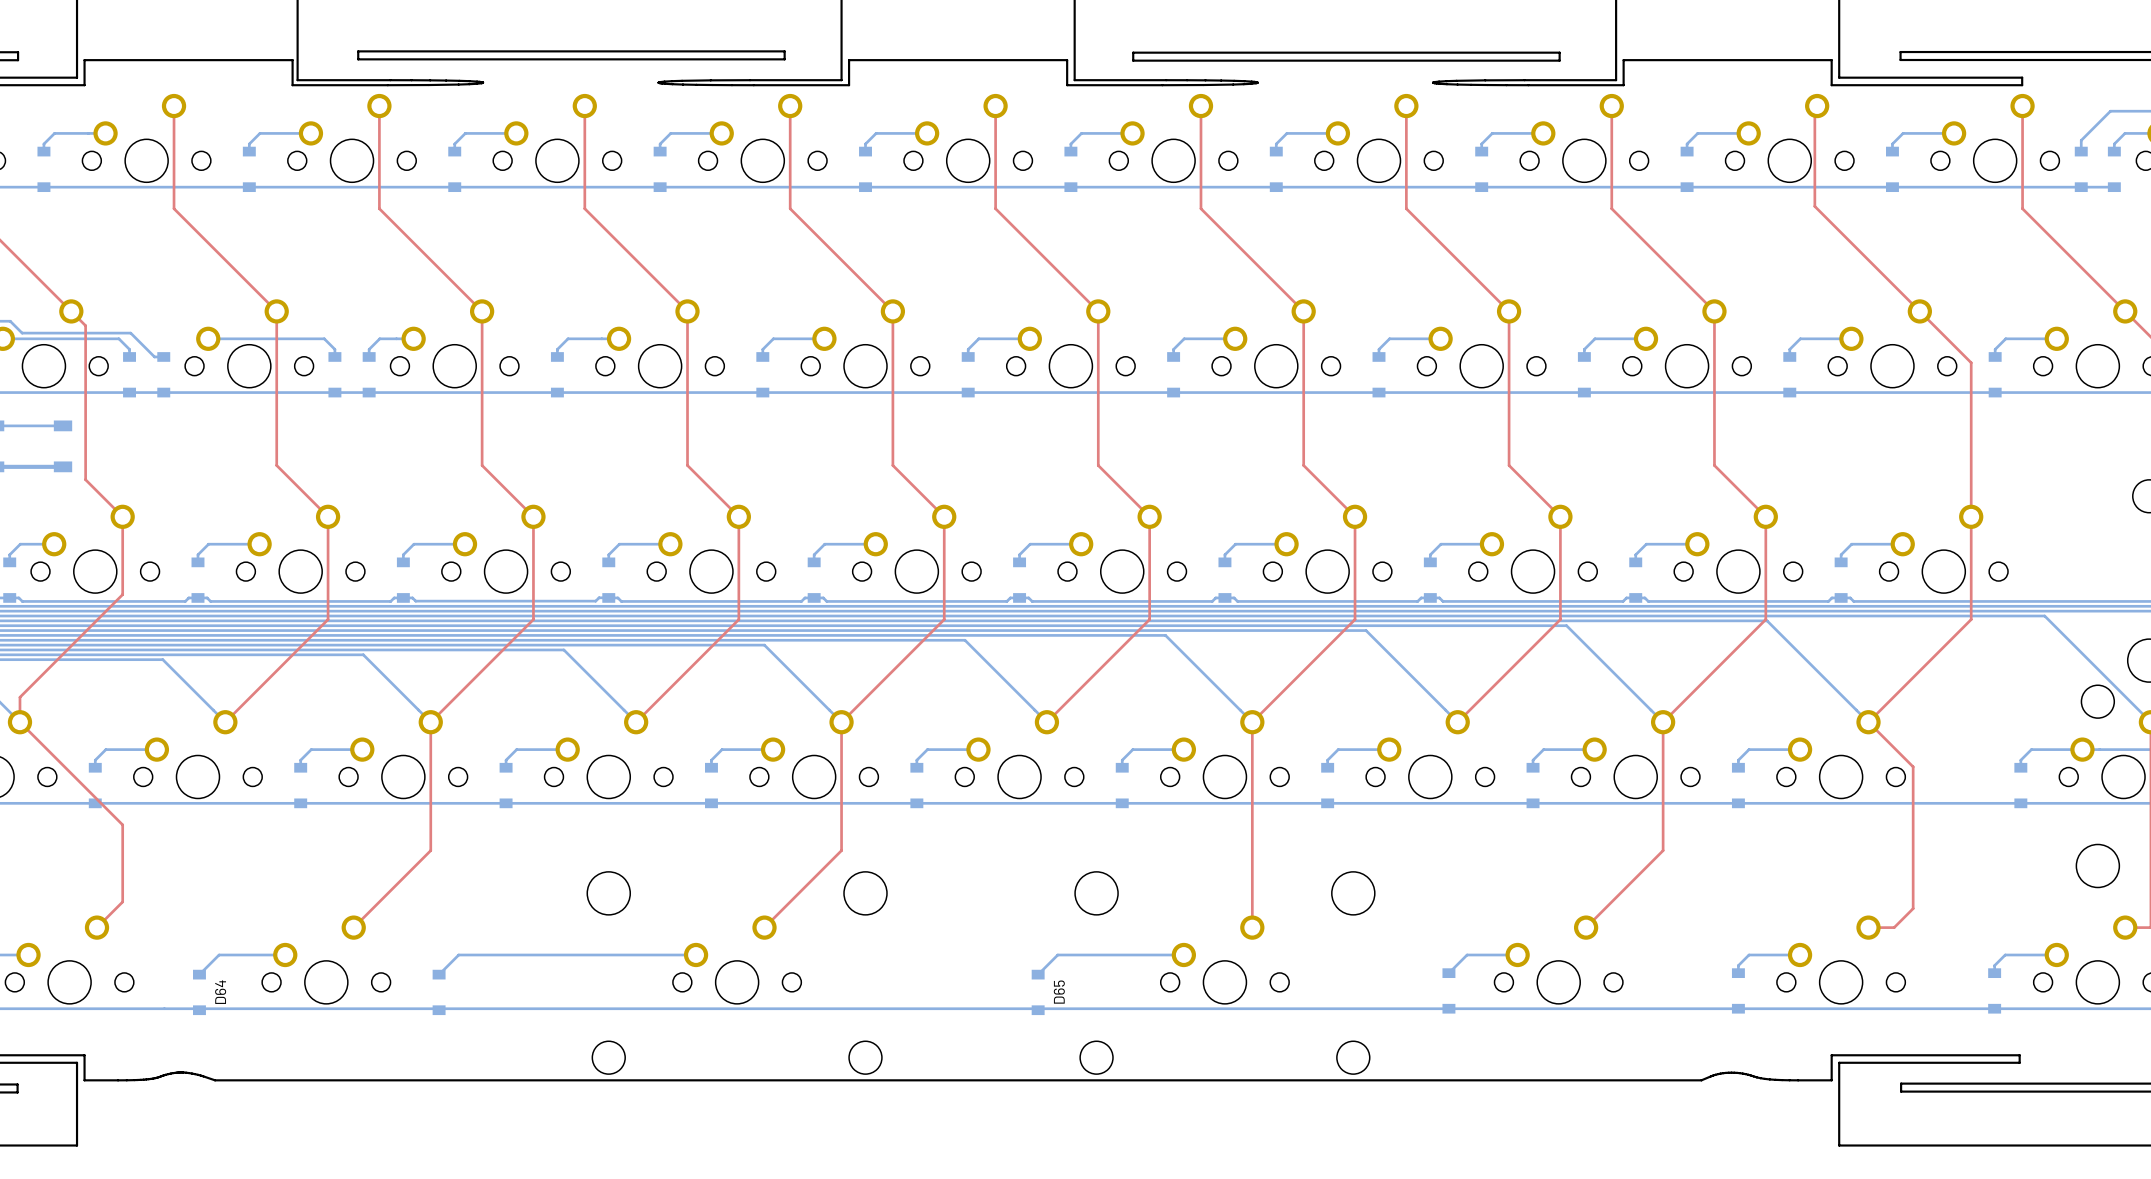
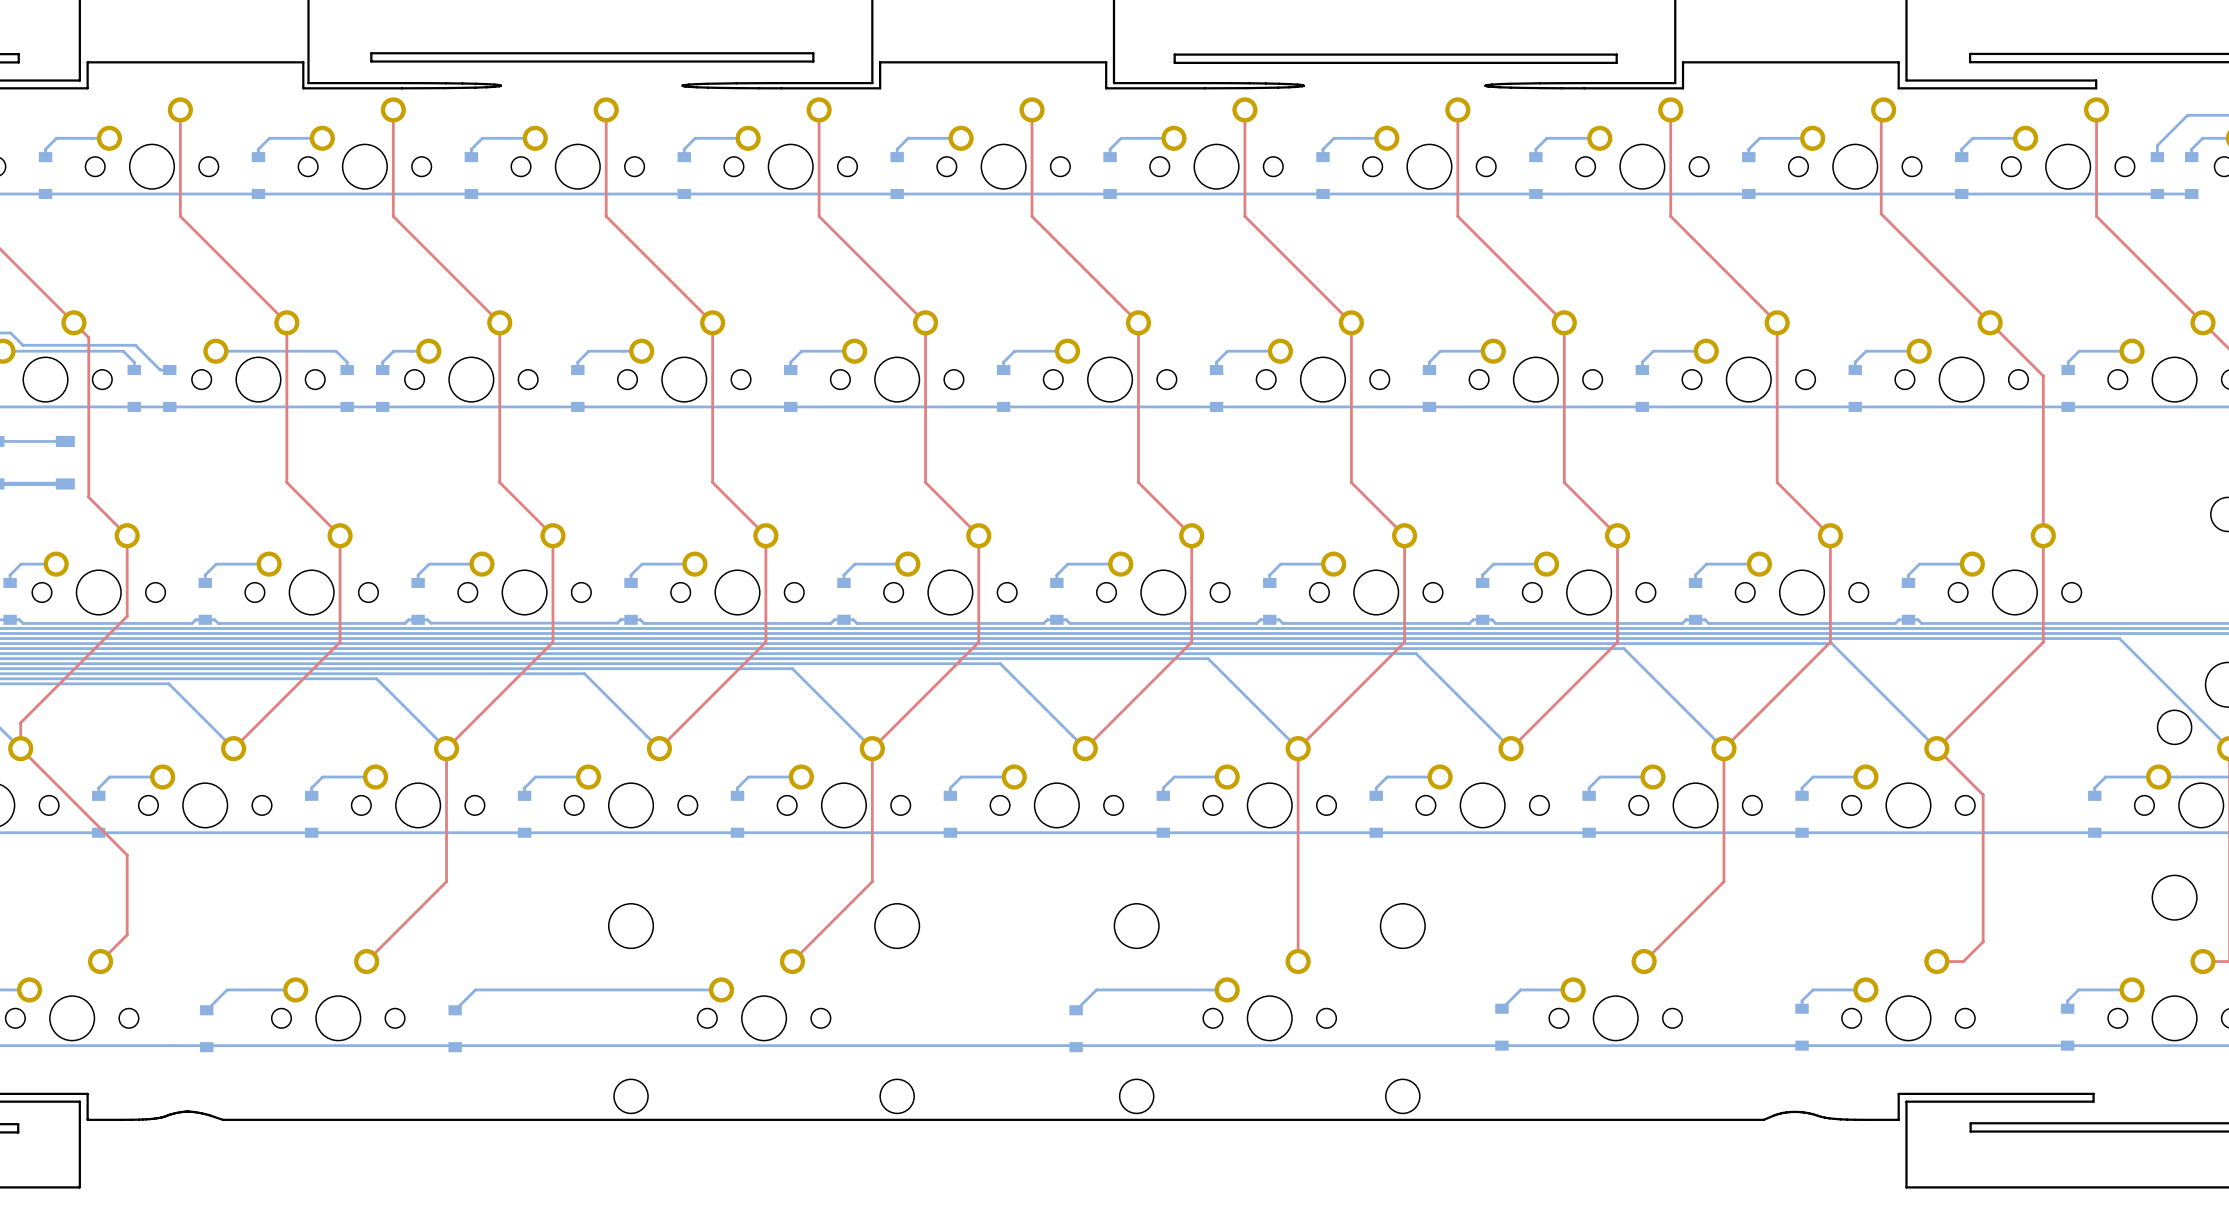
D64 name: D64 (220, 992) -> none
D65 name: D65 (1059, 992) -> none

